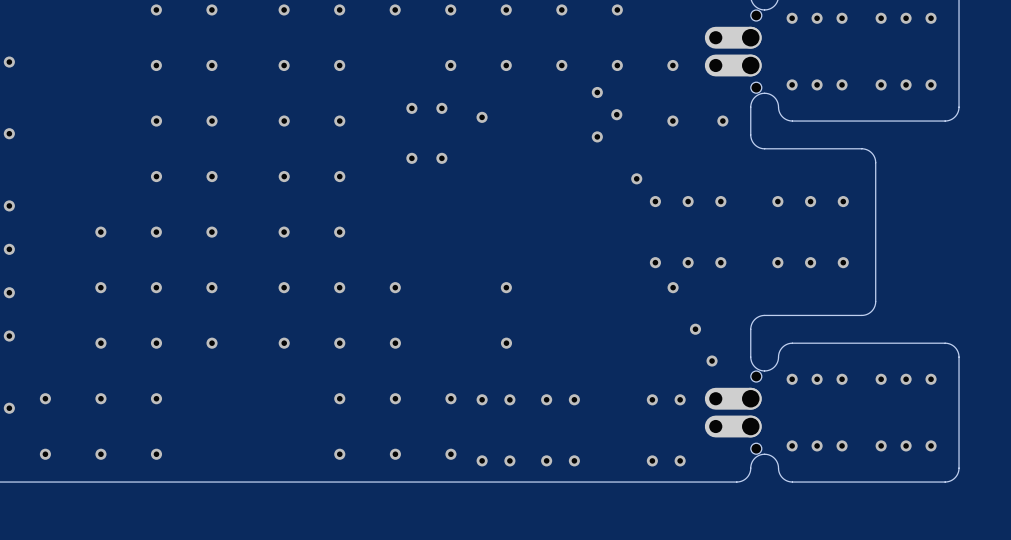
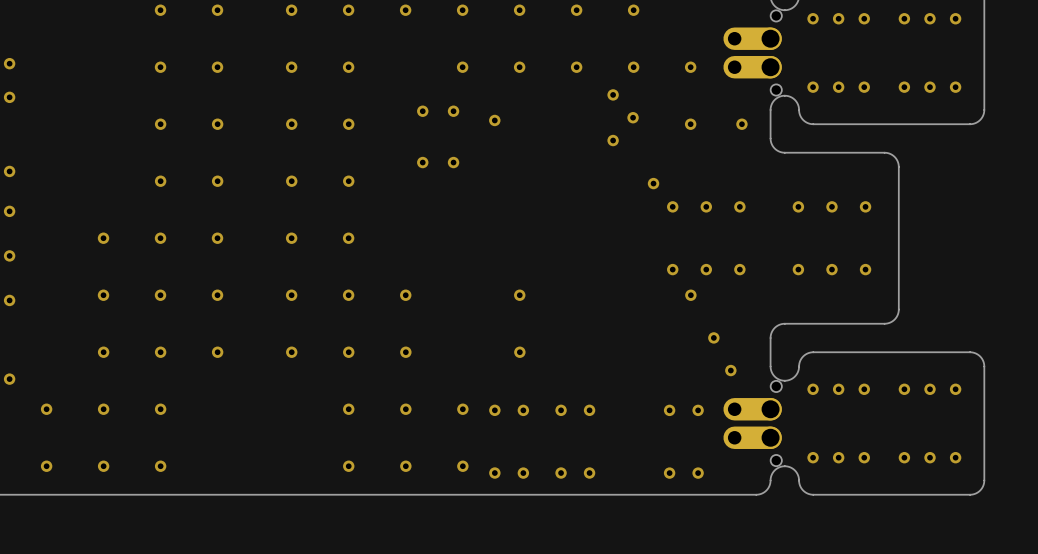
via: none -> (9, 97)
via: (9, 133) -> none
via: none -> (9, 171)
via: (9, 336) -> none
via: none -> (9, 379)
via: (9, 408) -> none

